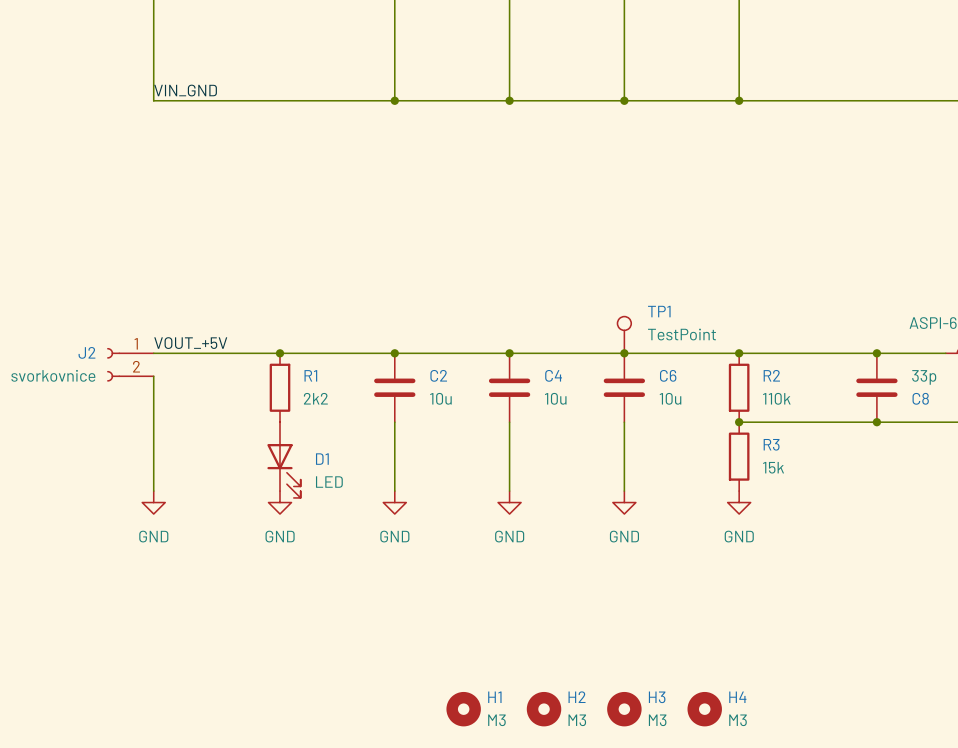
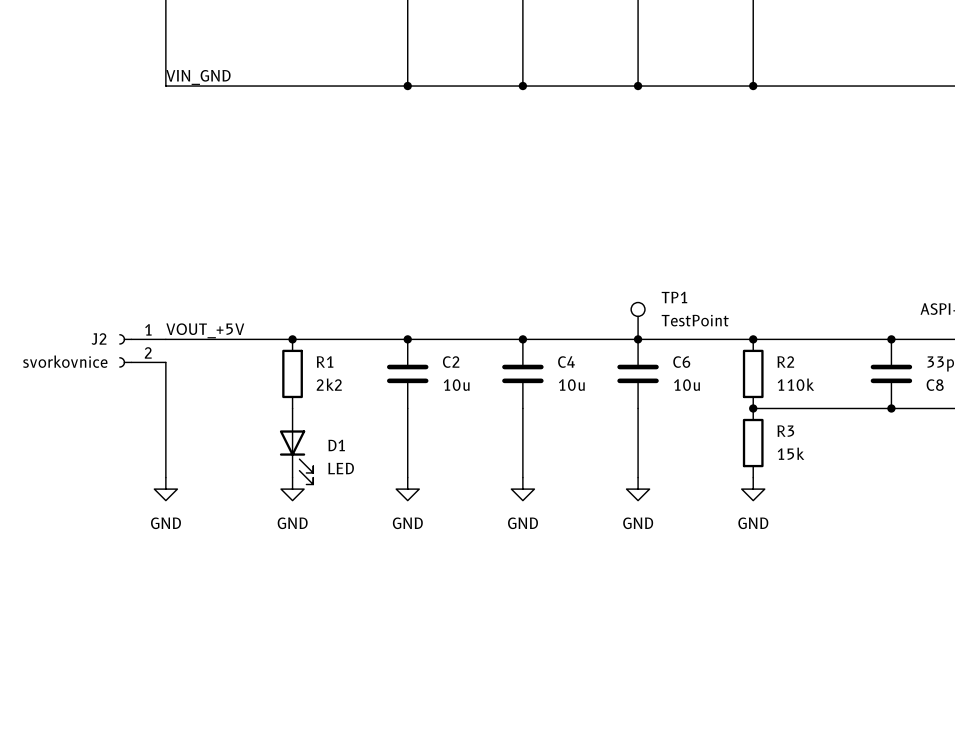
H1: M3 (463, 709) -> none
H2: M3 (544, 709) -> none
H3: M3 (624, 709) -> none
H4: M3 (704, 709) -> none

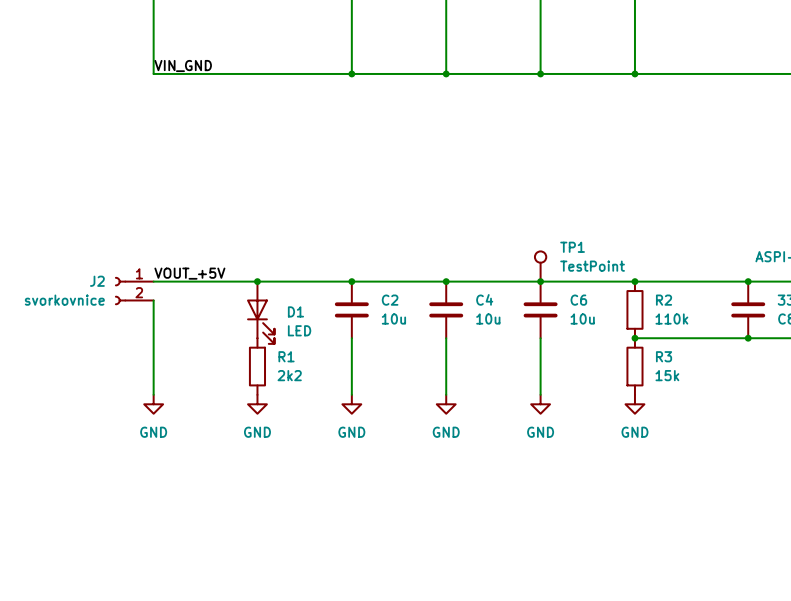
R1 position: (292, 373) -> (257, 366)
D1 position: (296, 446) -> (260, 312)

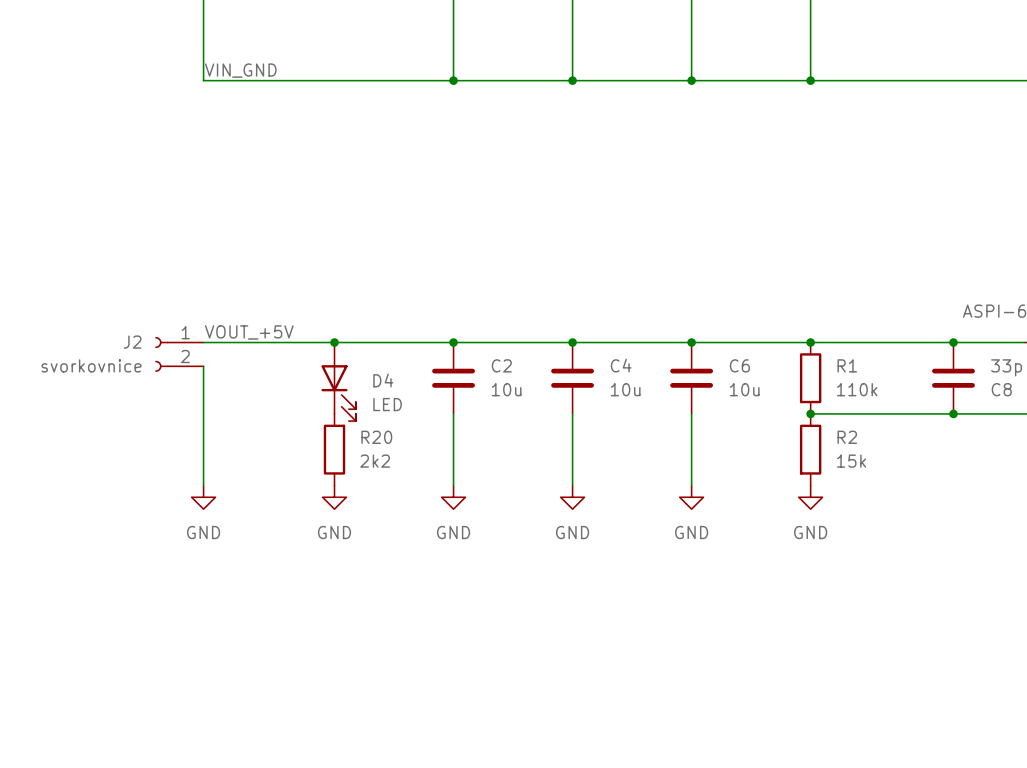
TP1: TestPoint (540, 266) -> none
R2 name: R2 (664, 300) -> R1 (847, 365)
D1 name: D1 (295, 311) -> D4 (383, 380)
R1 name: R1 (286, 356) -> R20 (376, 437)
R3 name: R3 (664, 356) -> R2 (847, 437)

